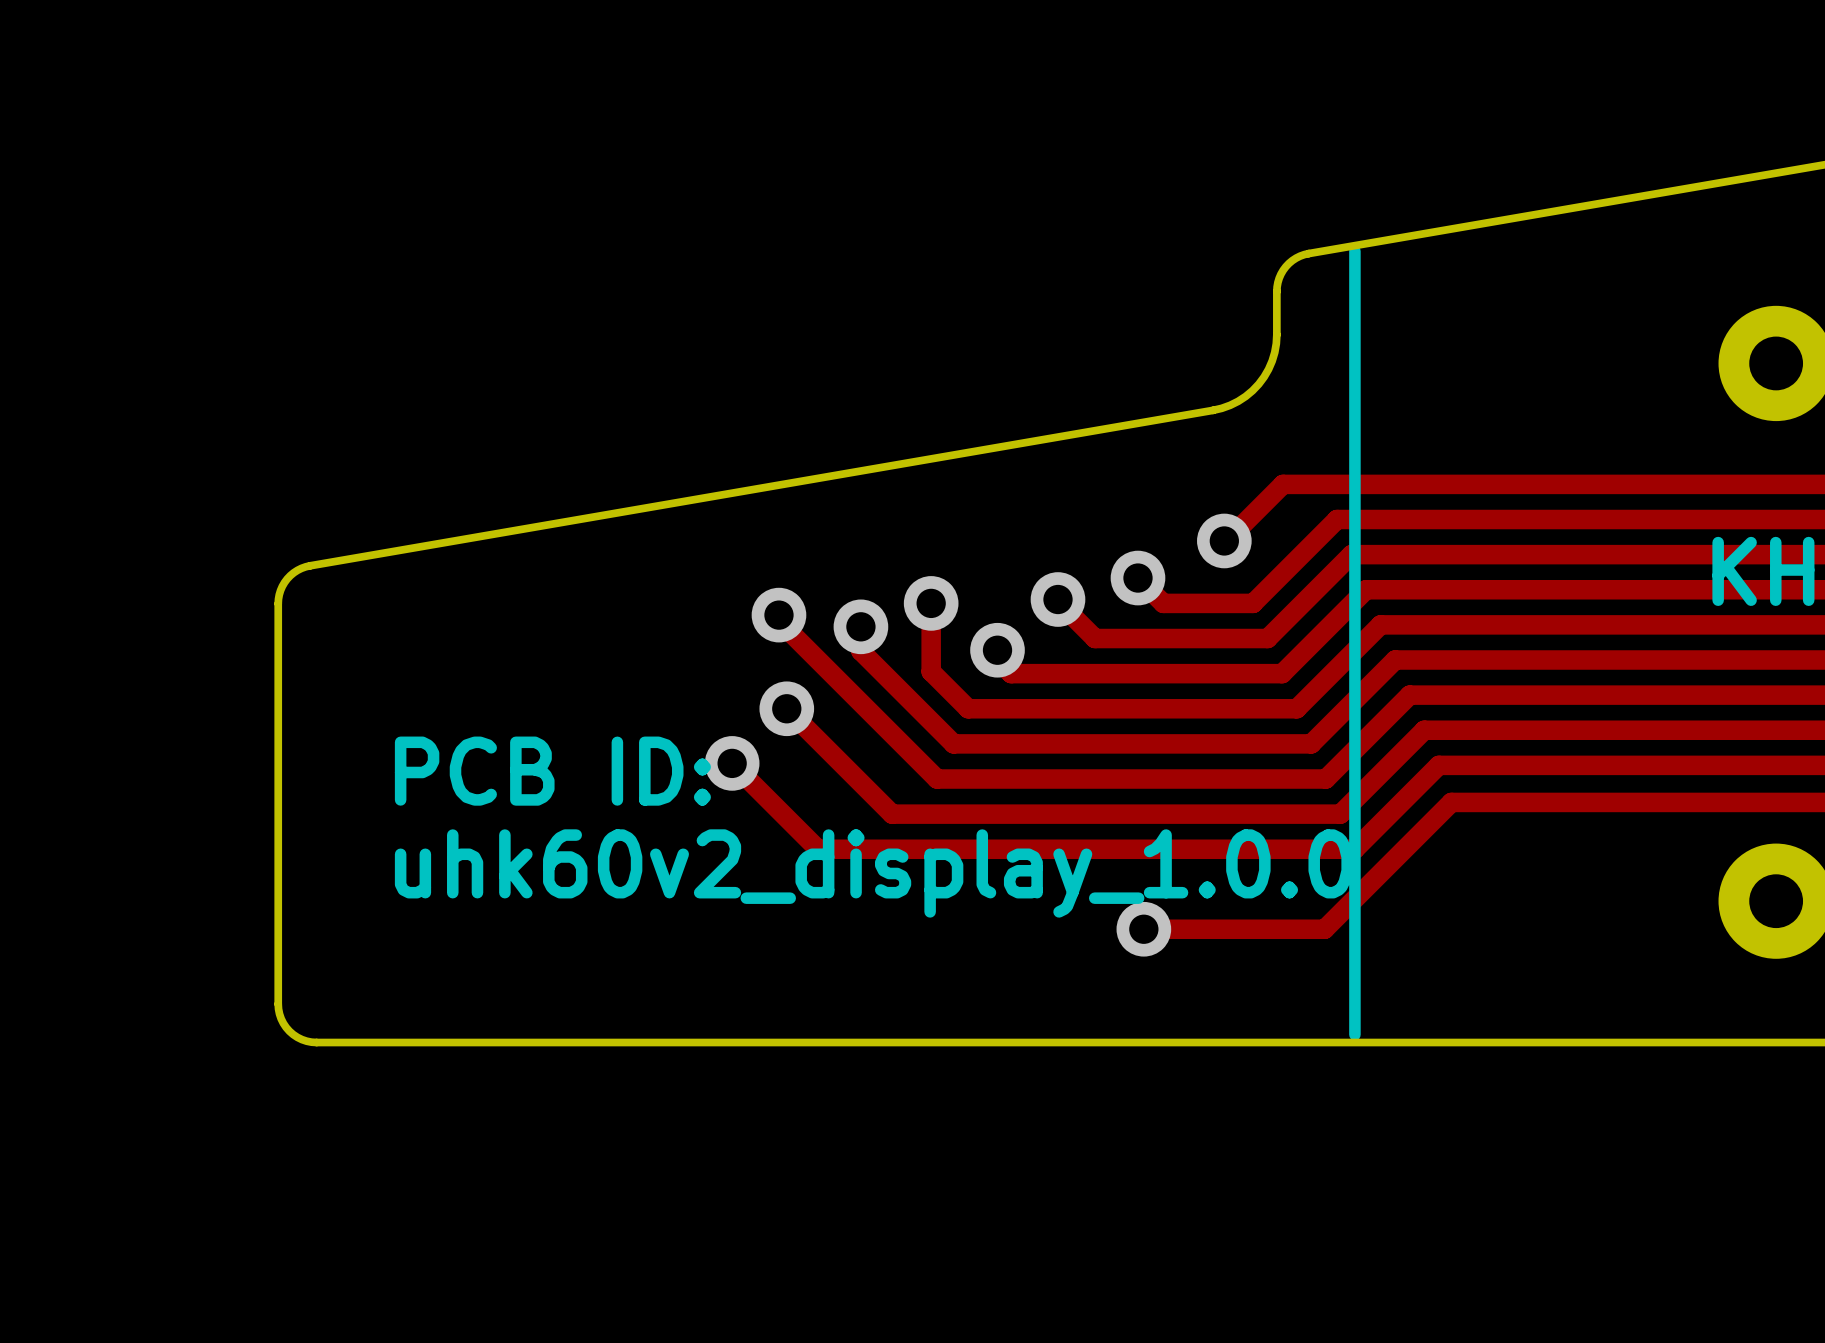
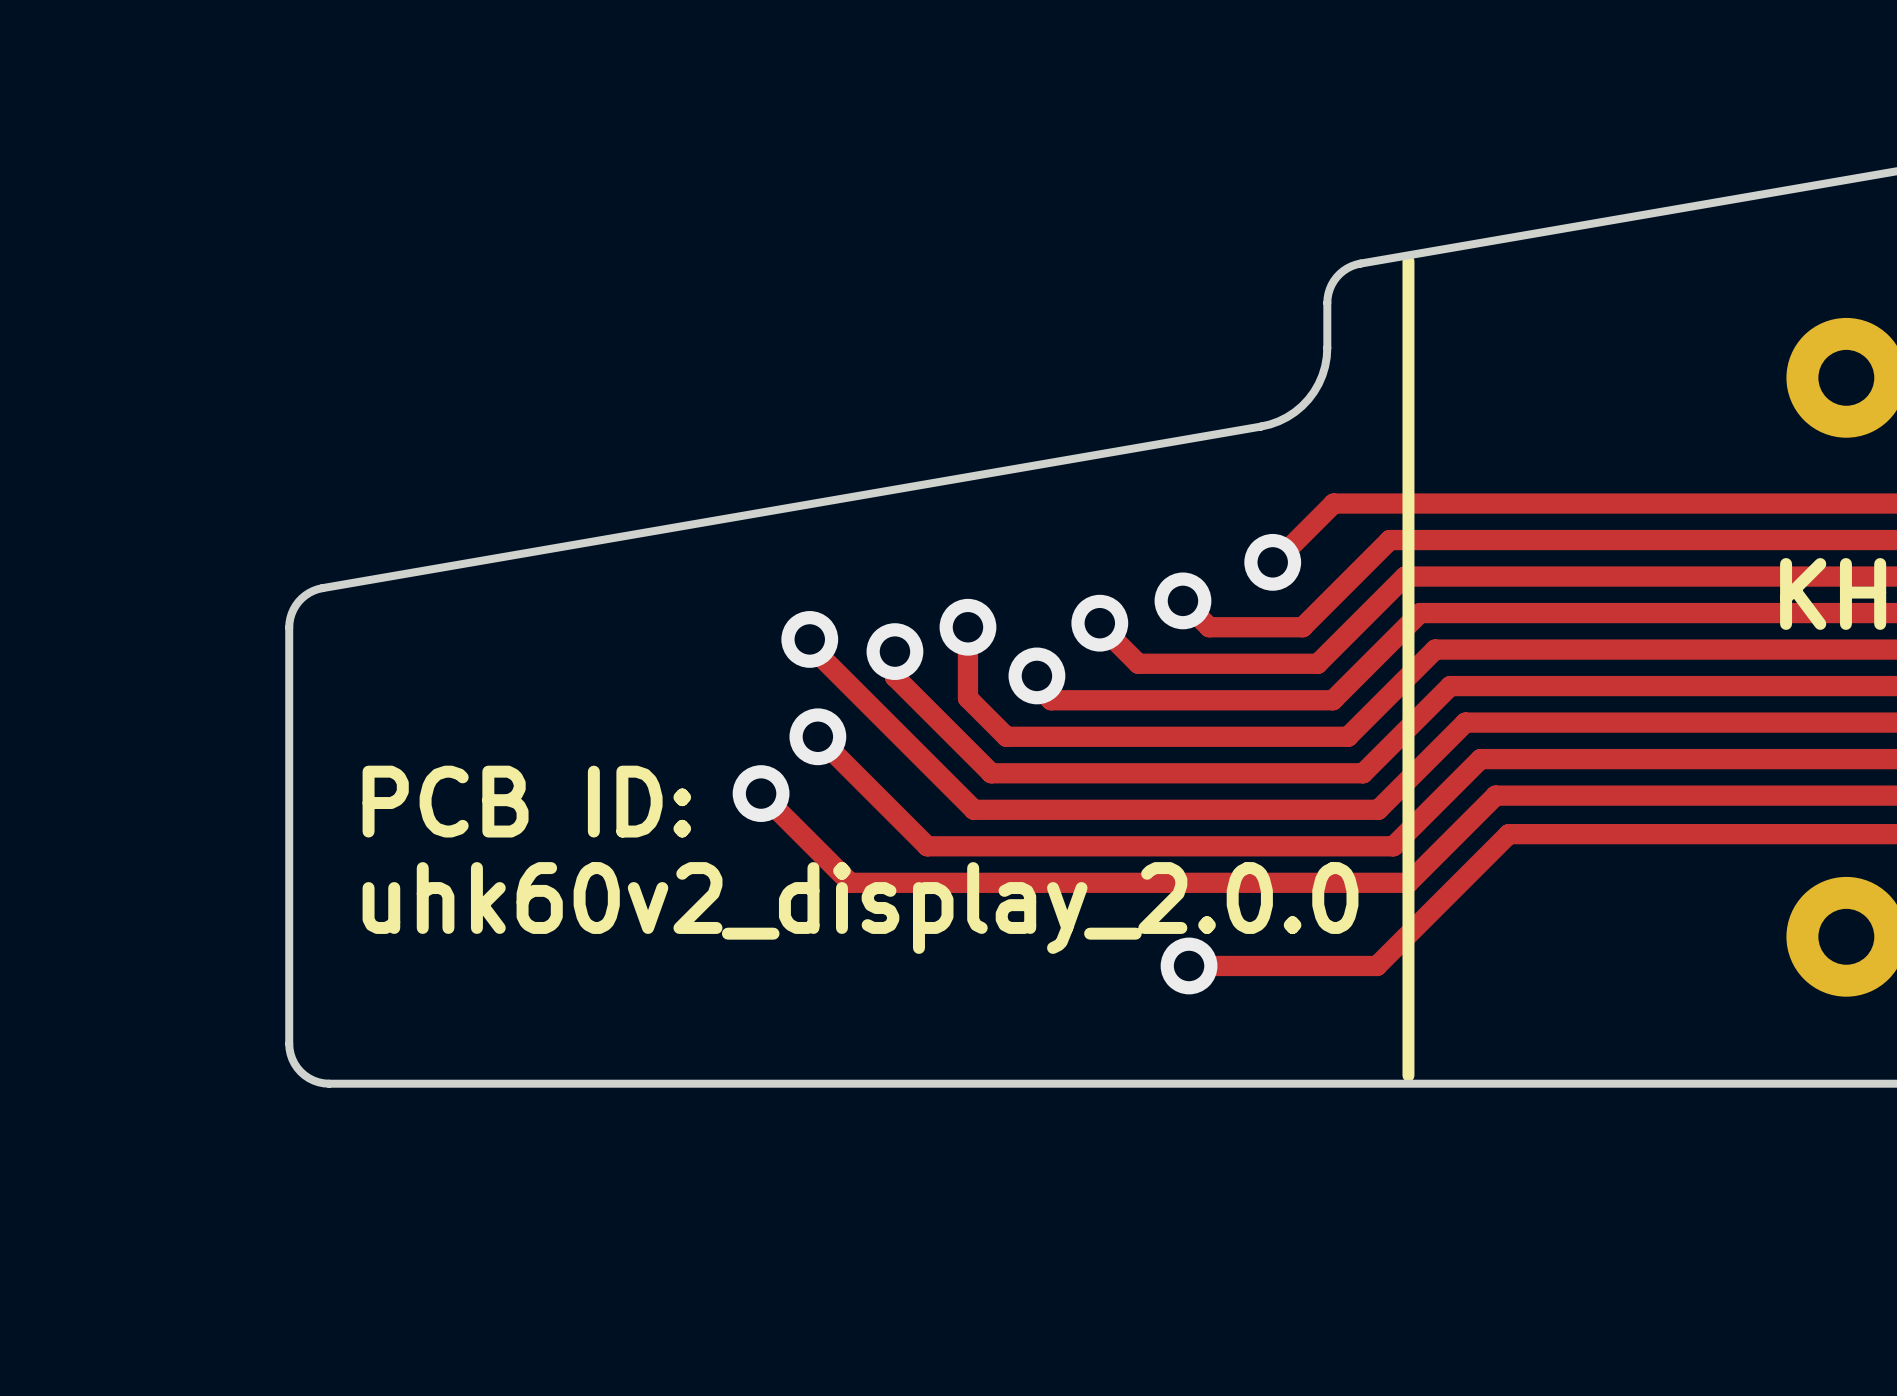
text position: PCB ID: (552, 771) -> PCB ID: (526, 801)
text: uhk60v2_display_1.0.0 (873, 873) -> uhk60v2_display_2.0.0 (860, 908)

